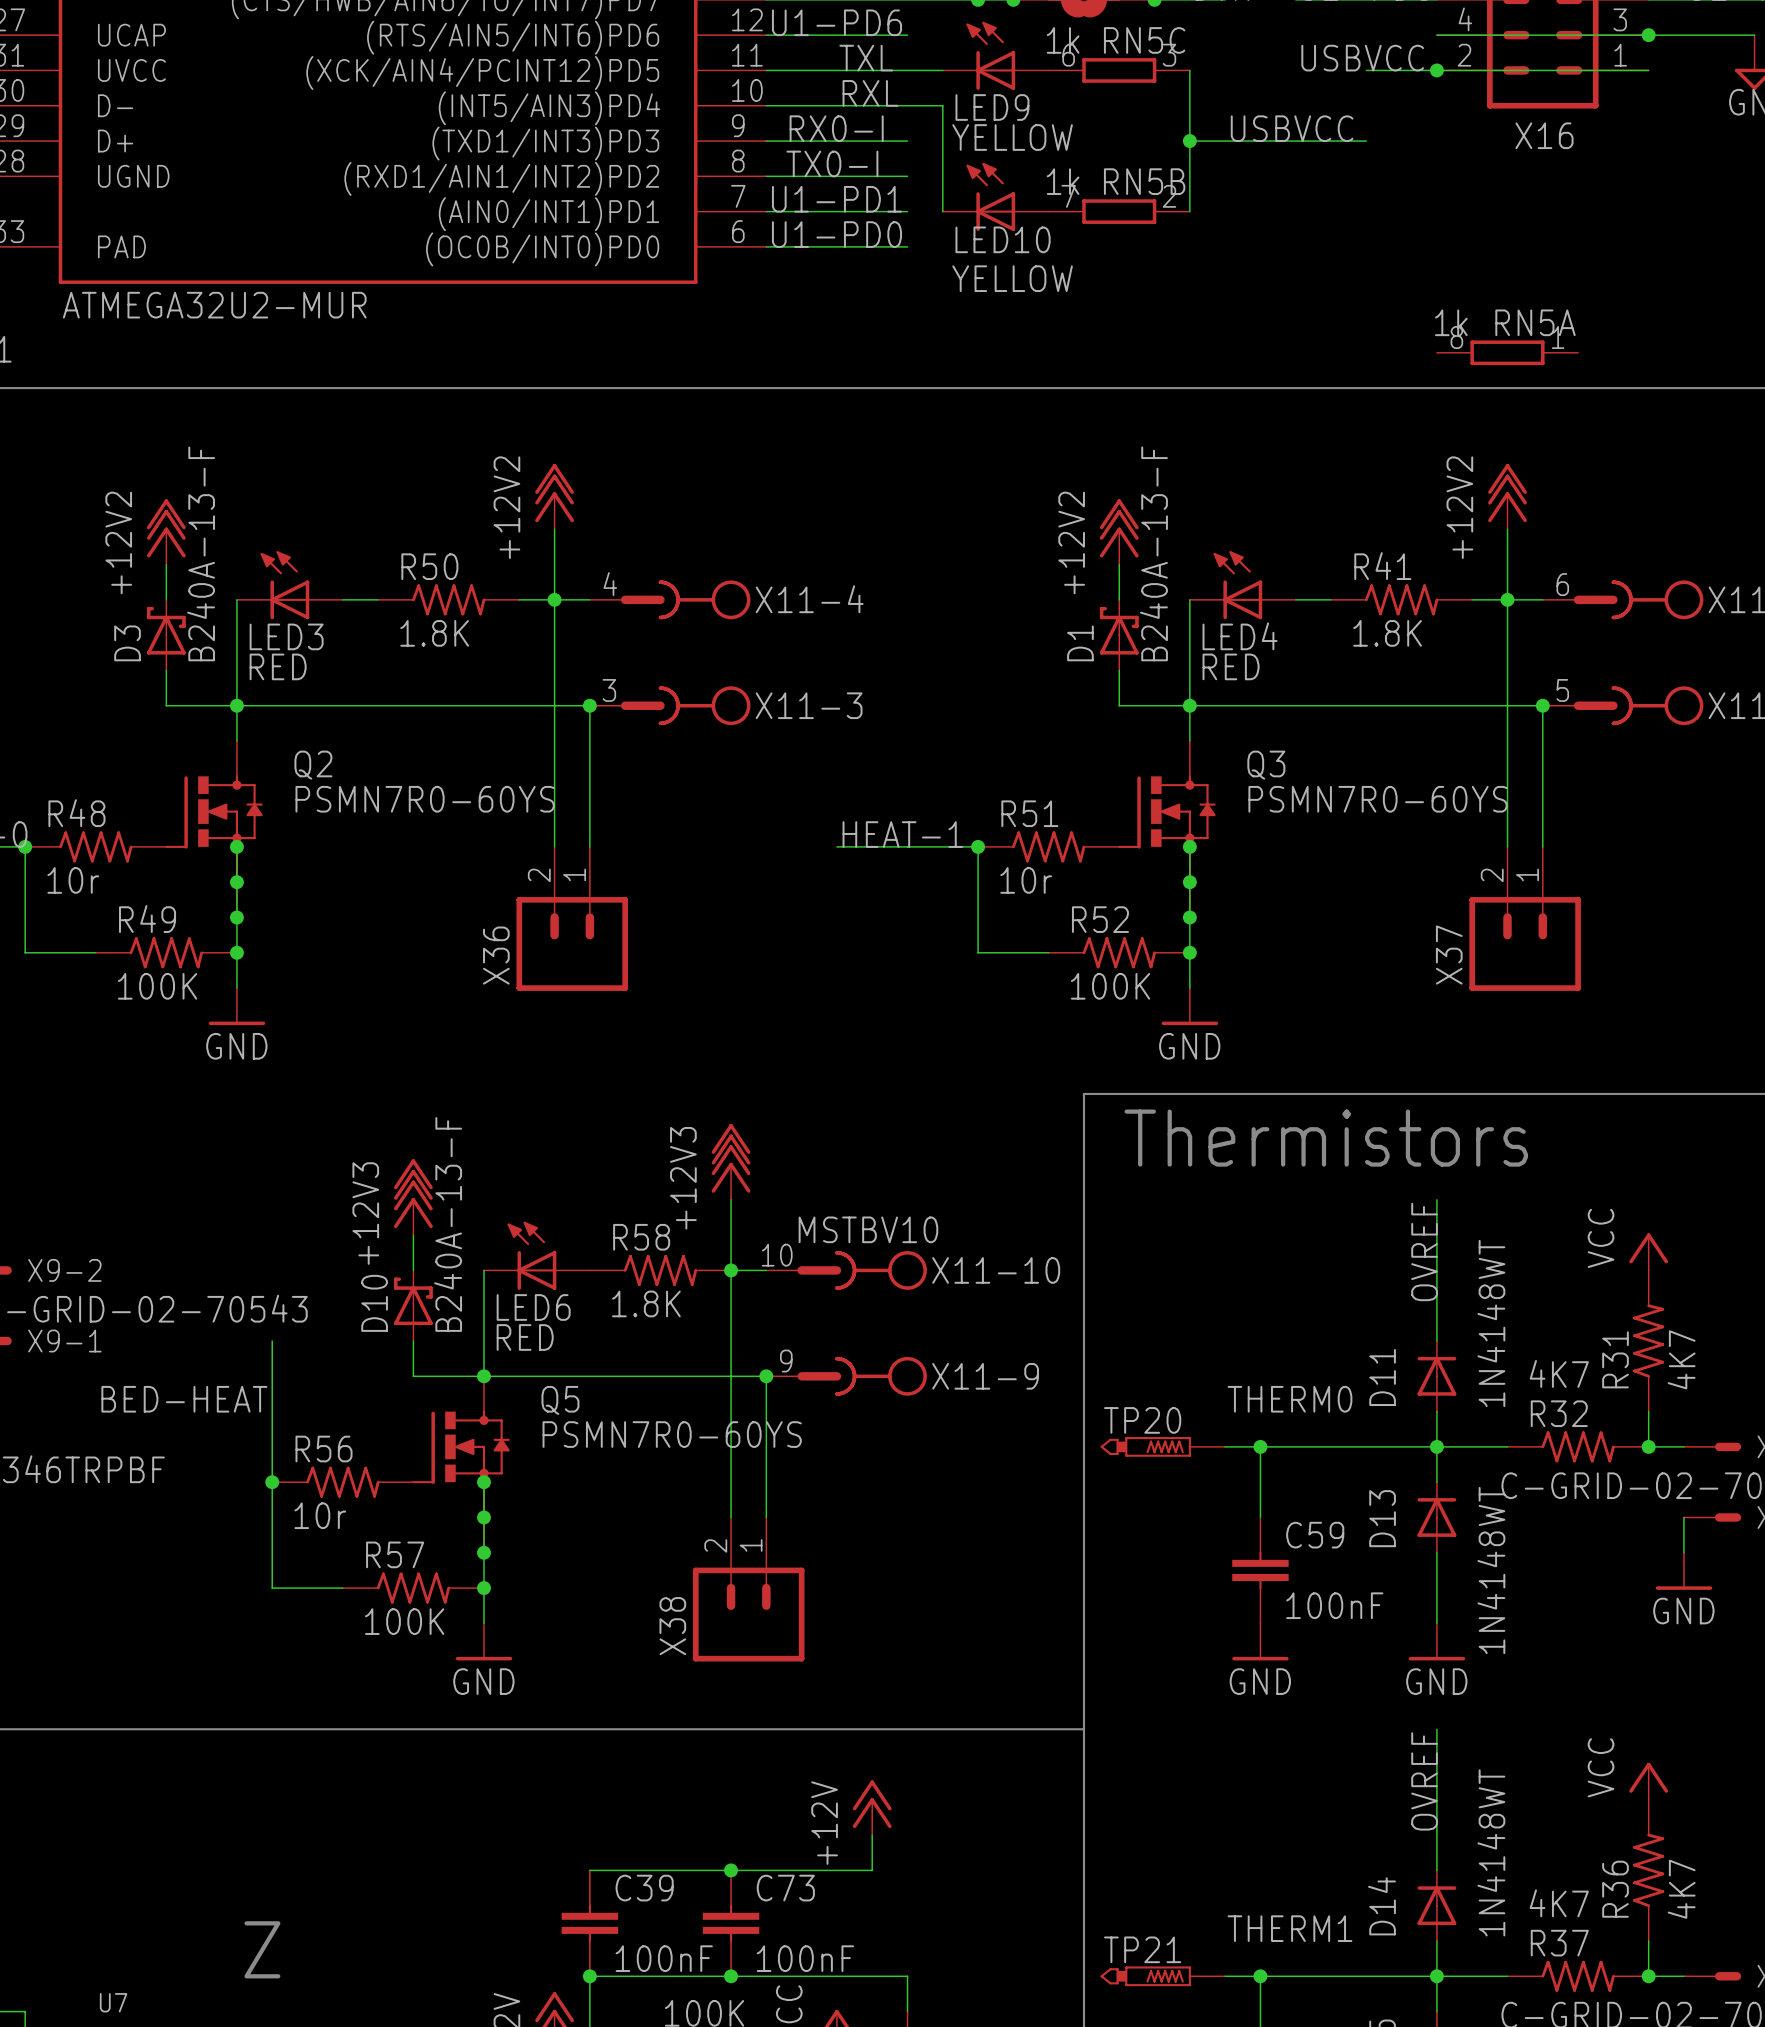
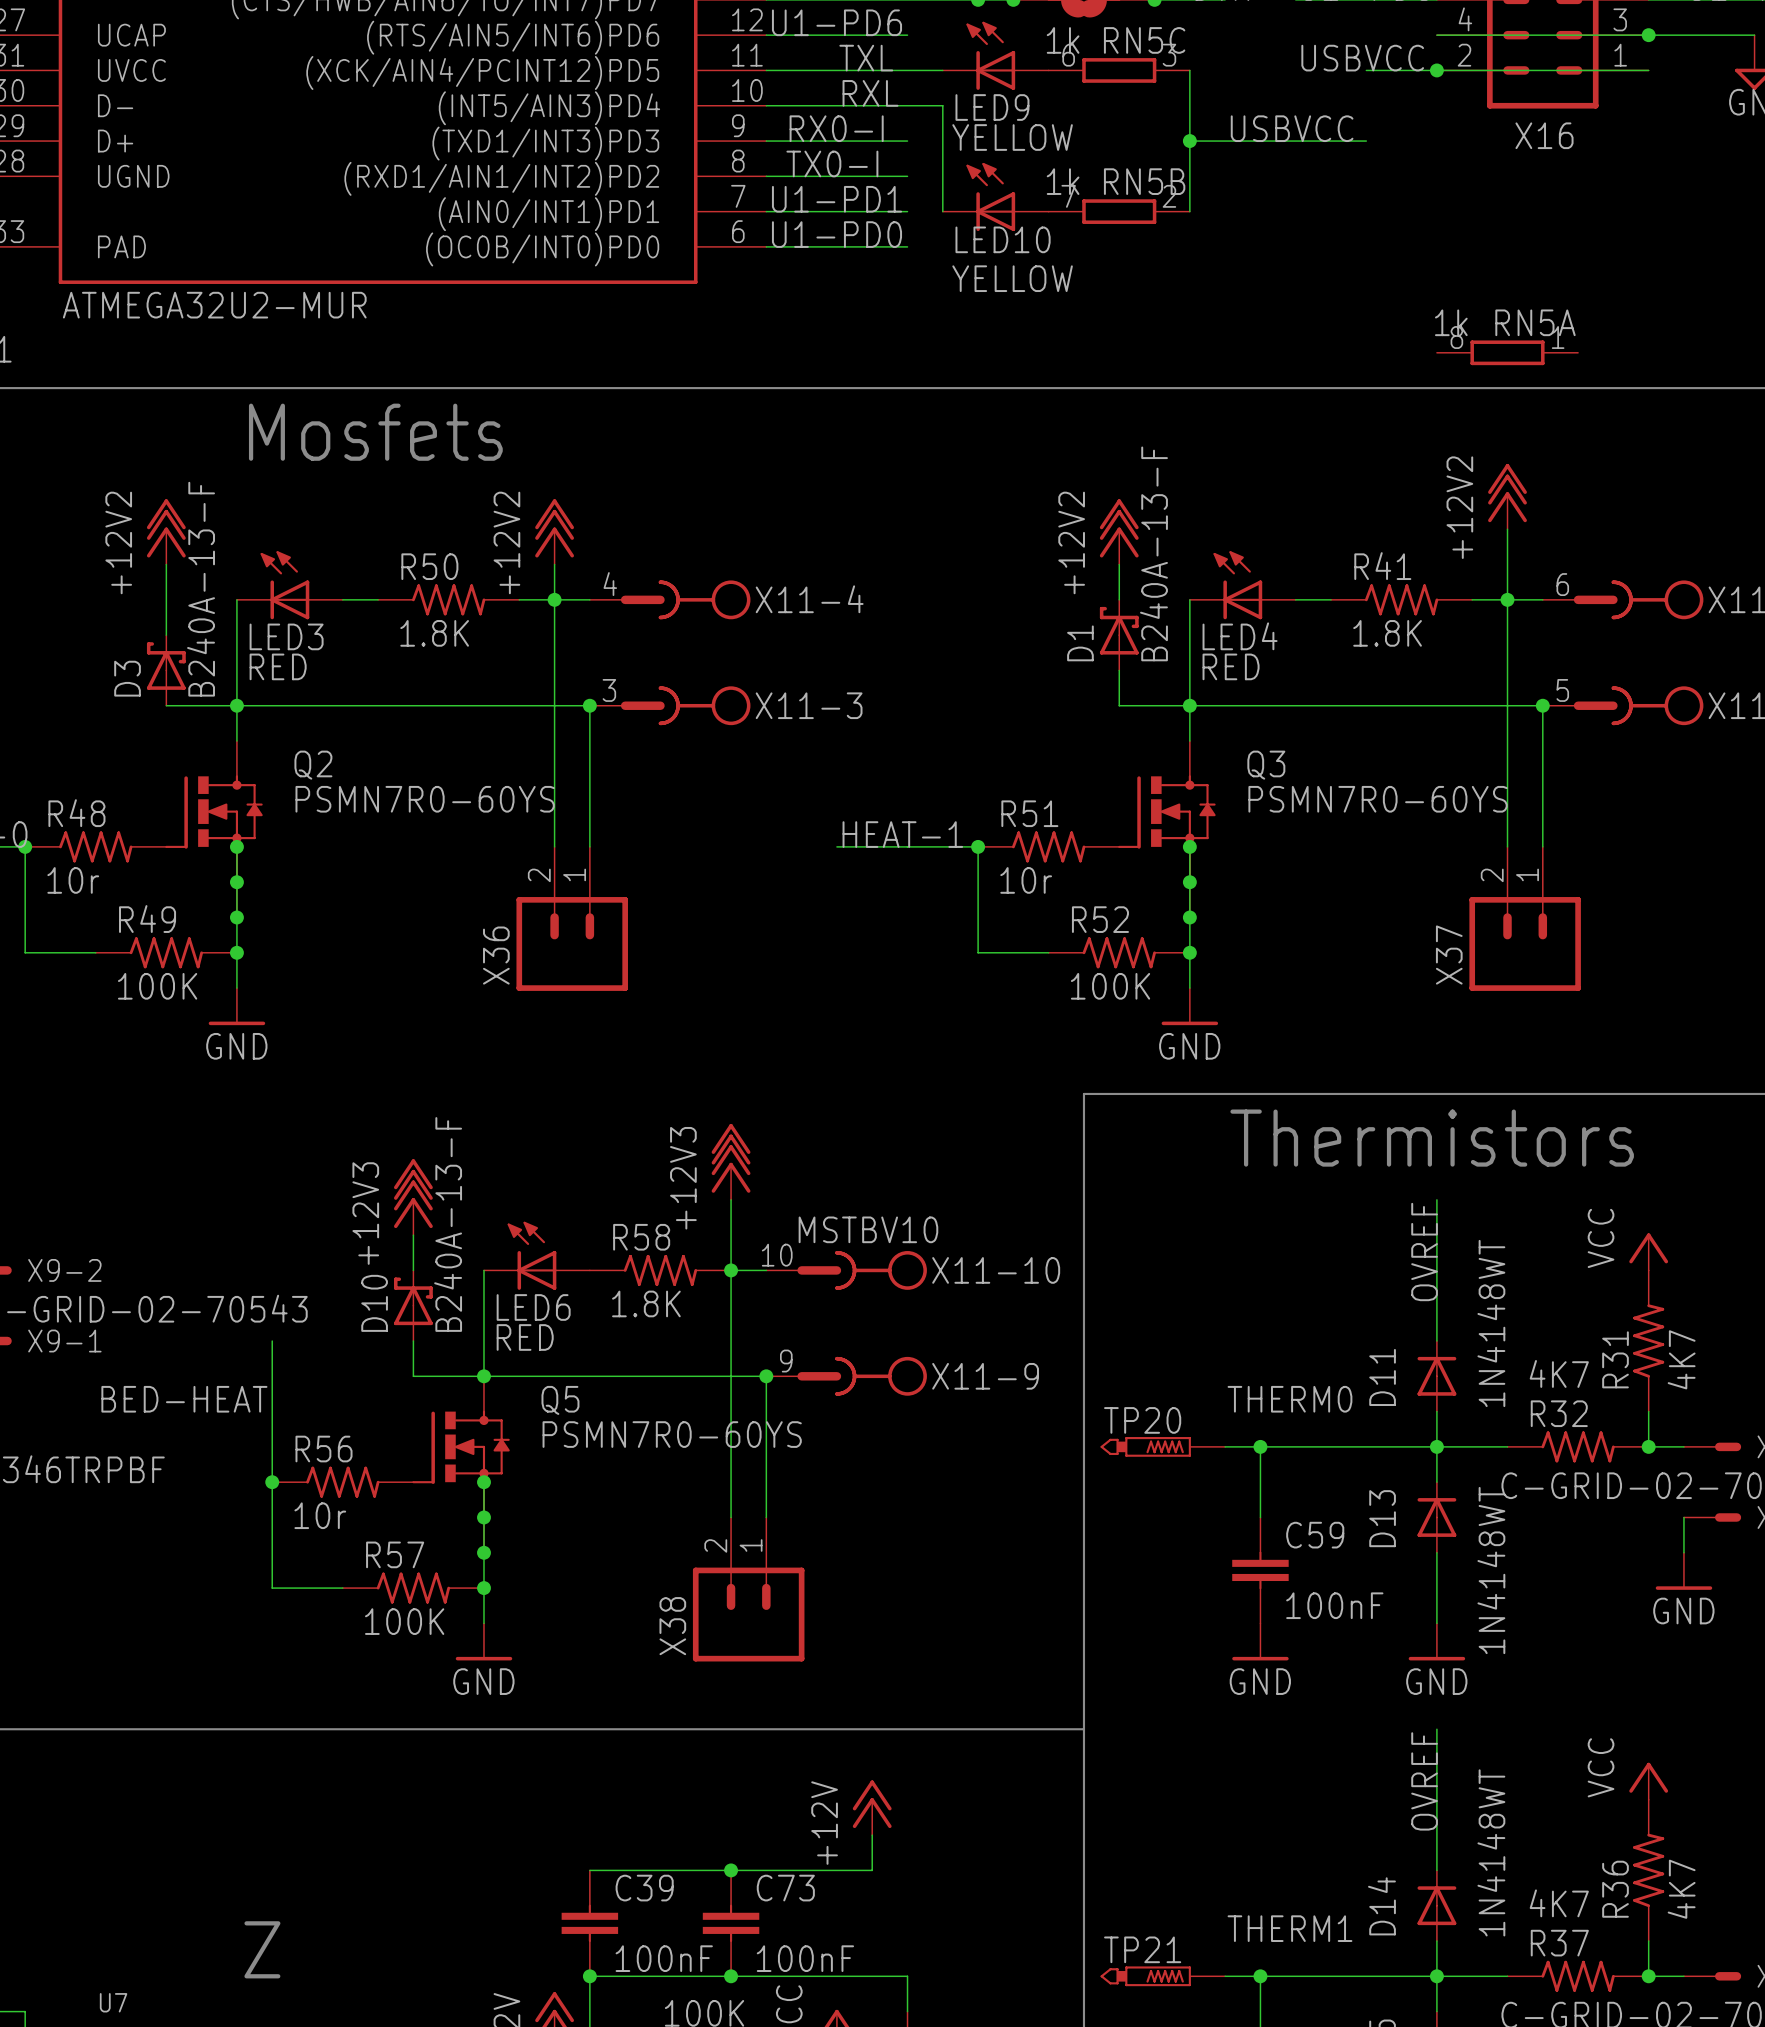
text: none -> Mosfets (375, 432)
power symbol position: +12V2 (554, 496) -> +12V2 (554, 531)
D3 position: (166, 635) -> (166, 670)
text position: Thermistors (1326, 1138) -> Thermistors (1432, 1138)

